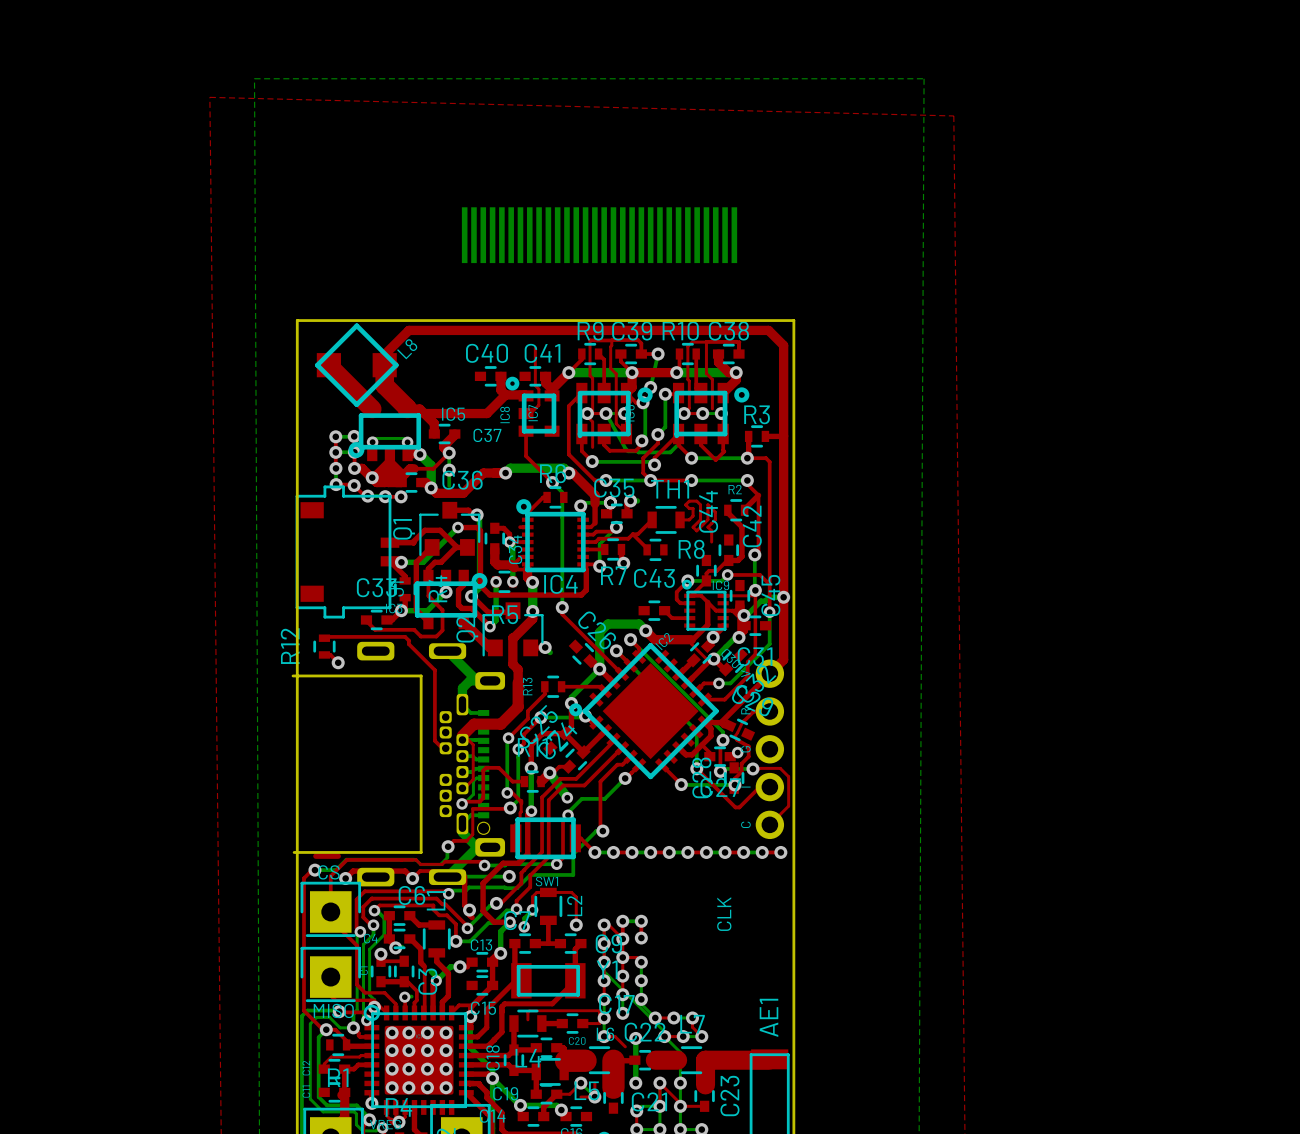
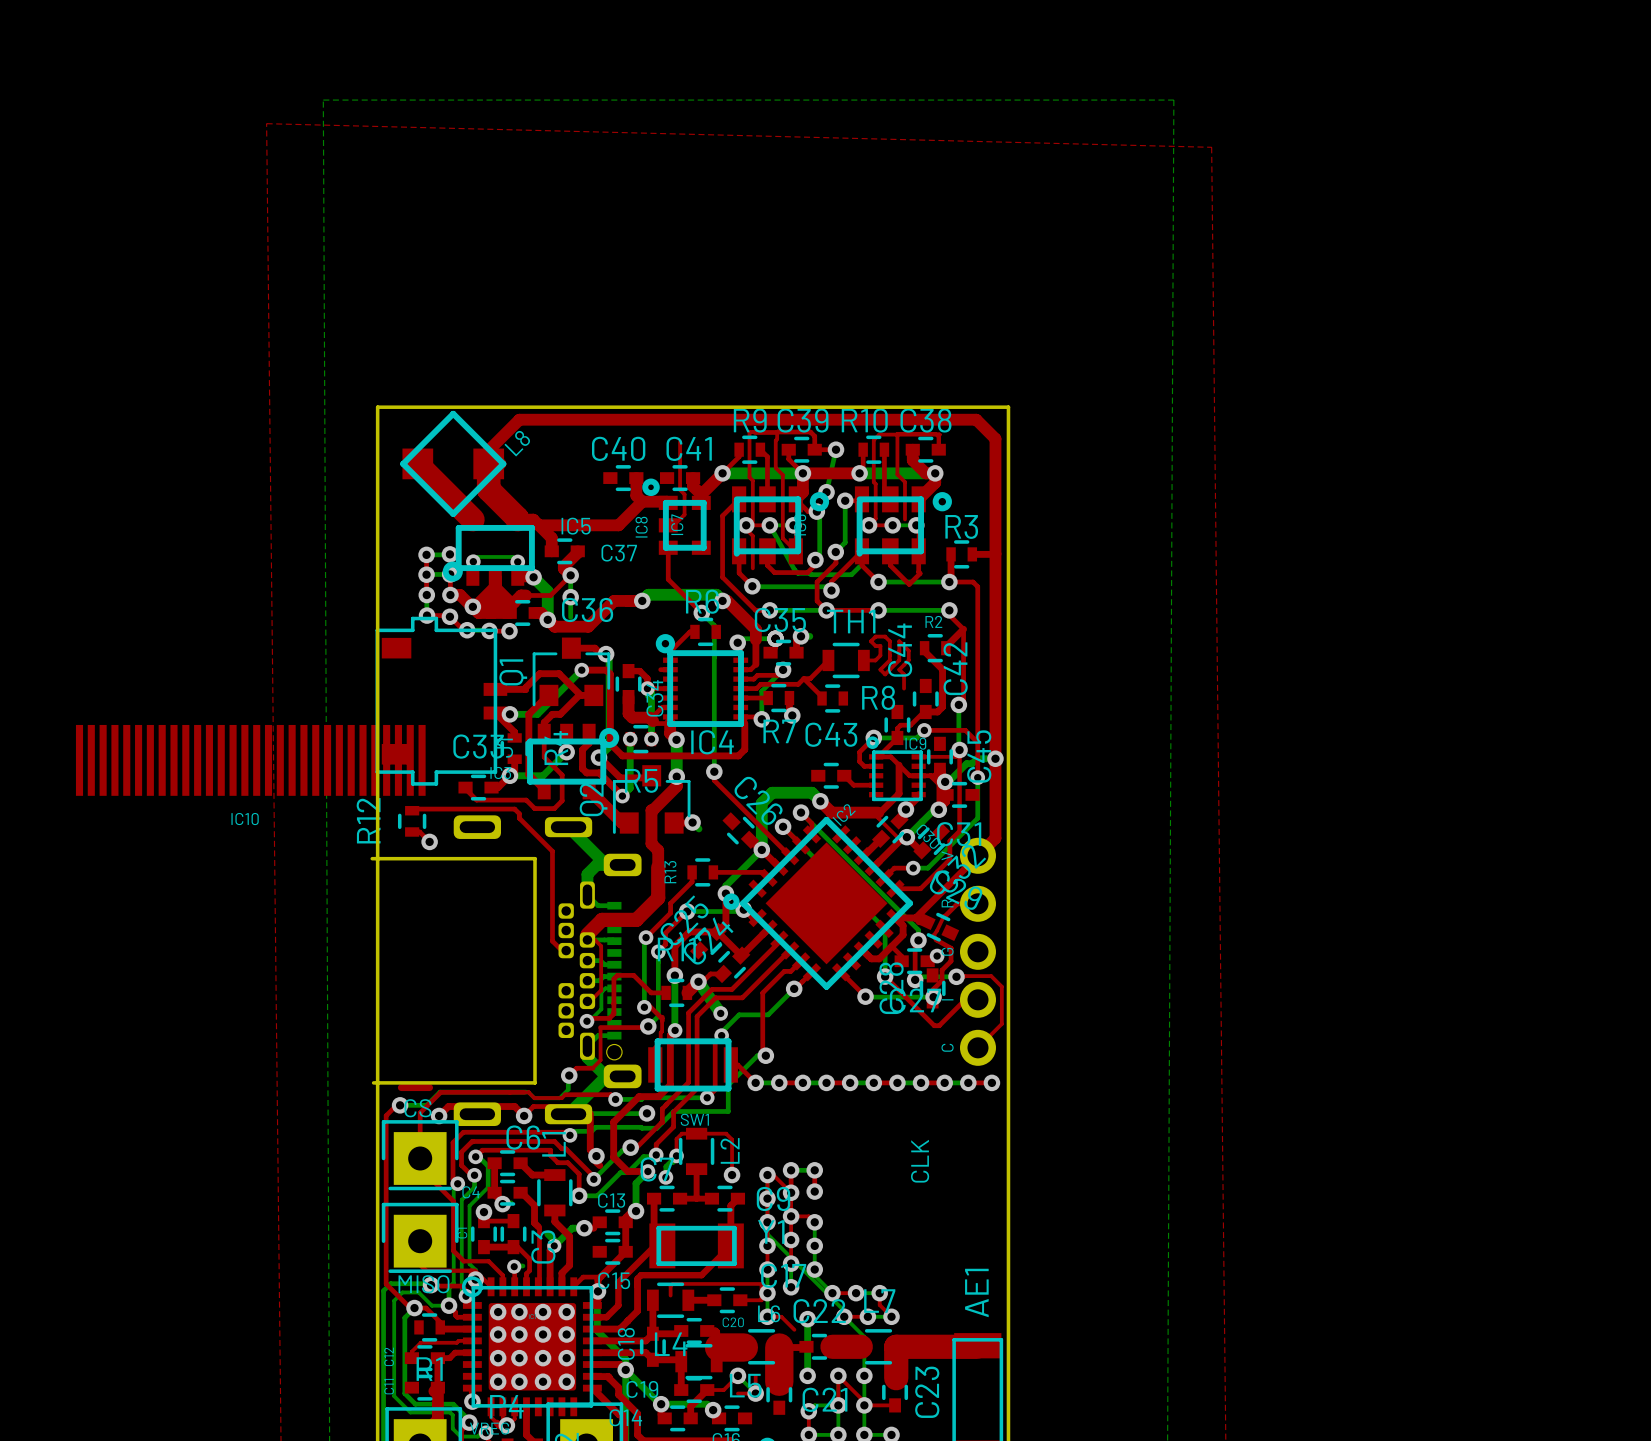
part: (599, 235) -> none
IC10: none -> (250, 760)

